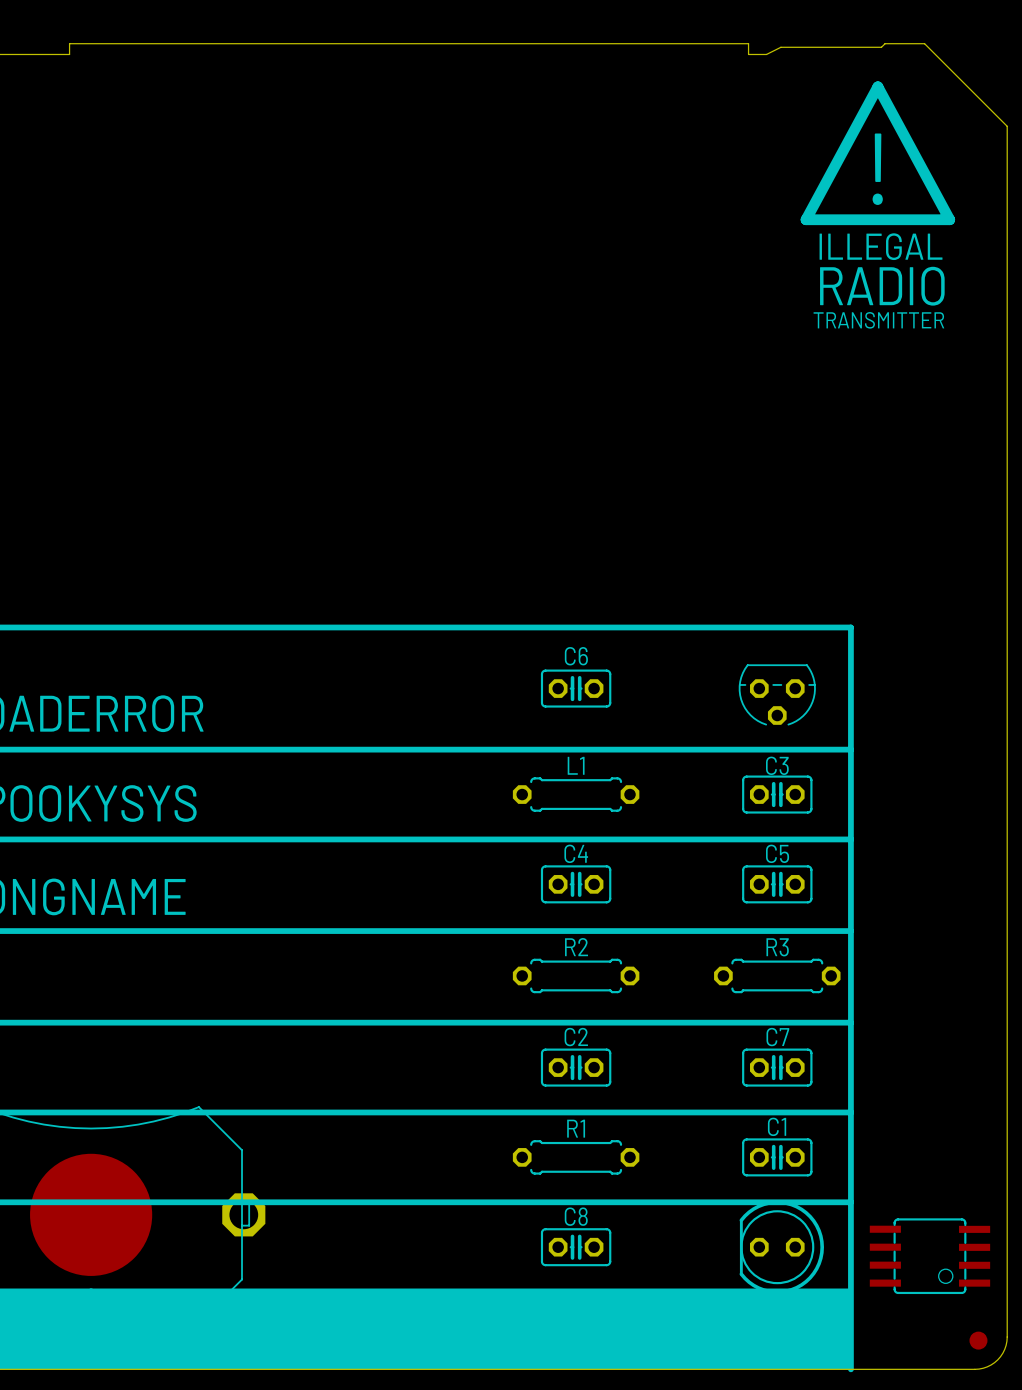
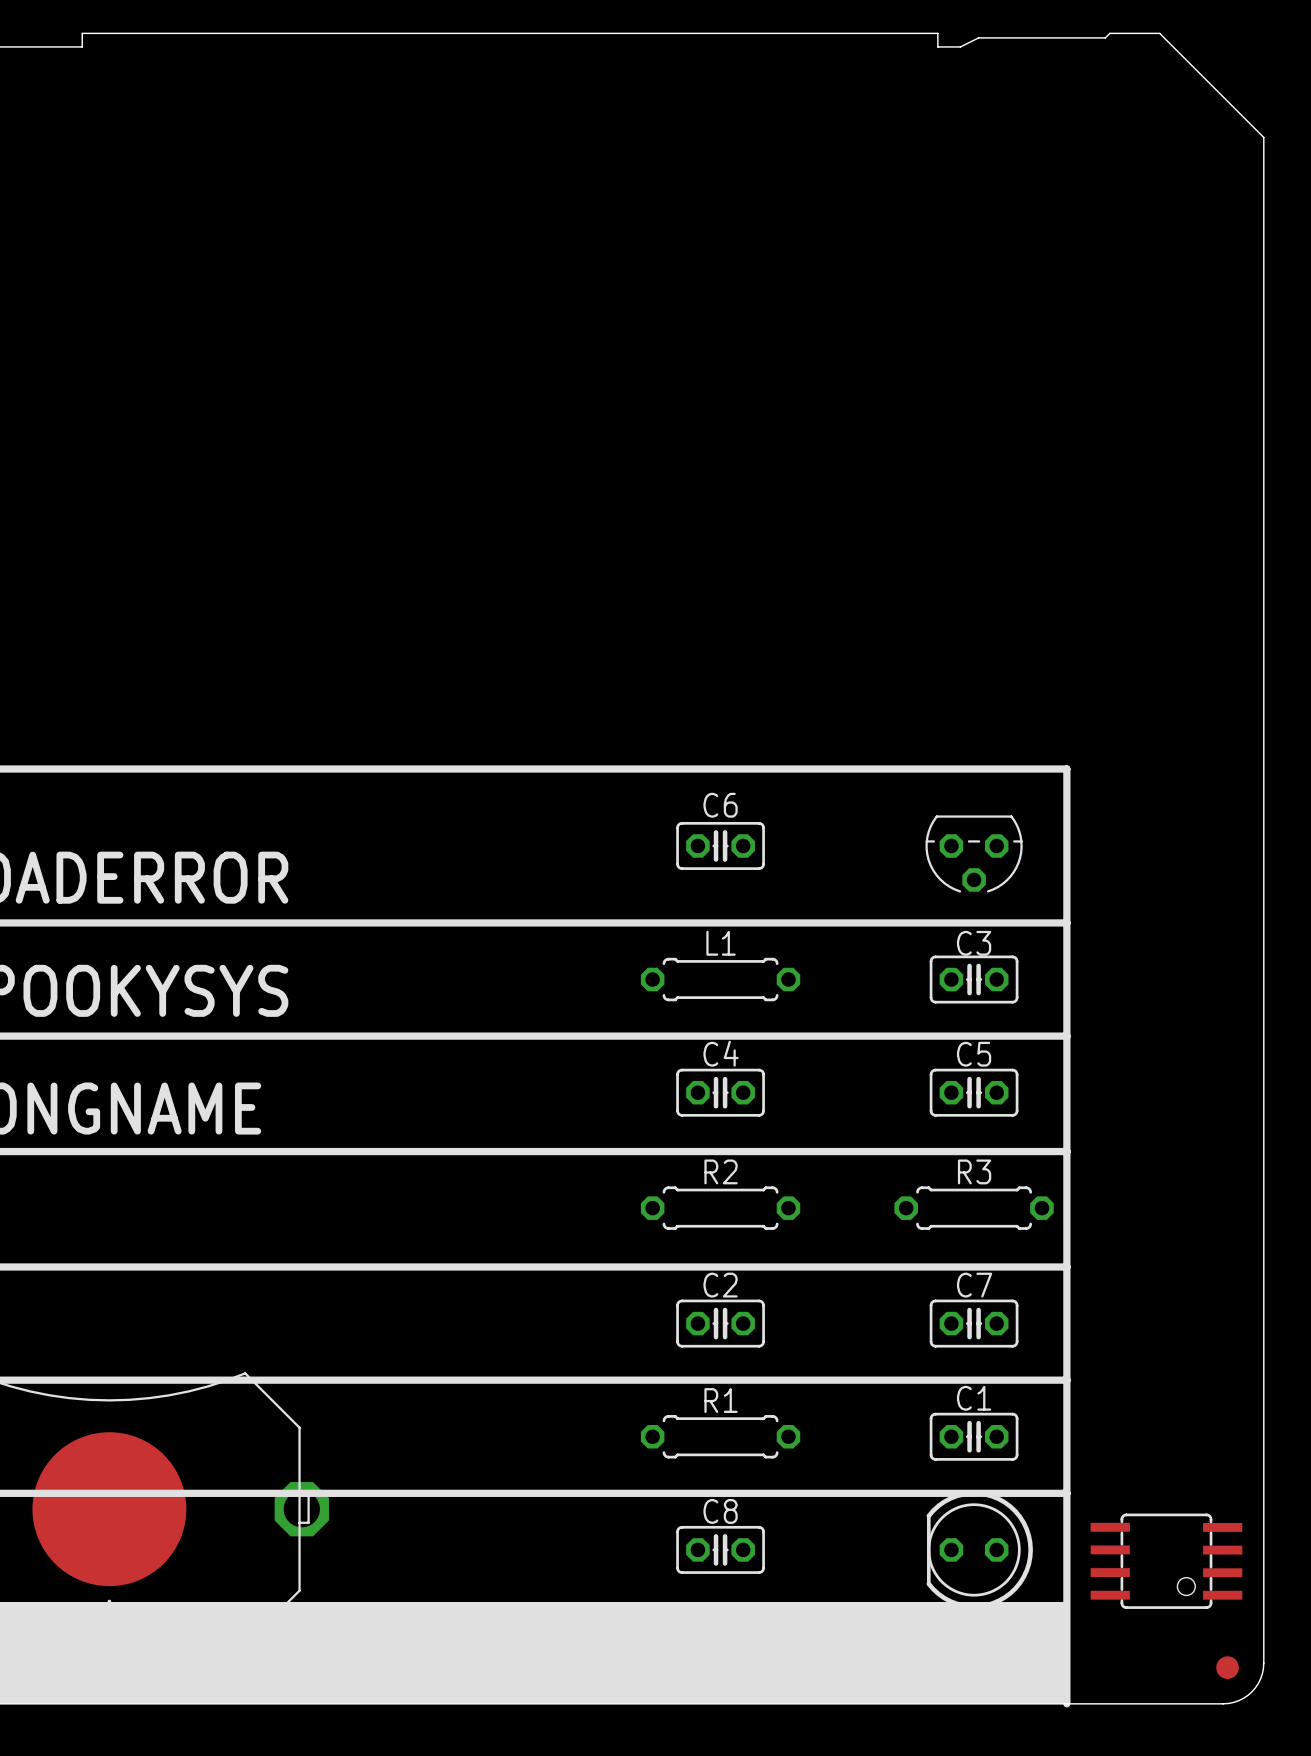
line: (877, 86) (949, 219) (806, 219) (877, 86) -> none
text: ! (877, 169) -> none
text: ILLEGAL (881, 246) -> none
text: RADIO (882, 286) -> none
text: TRANSMITTER (878, 320) -> none

